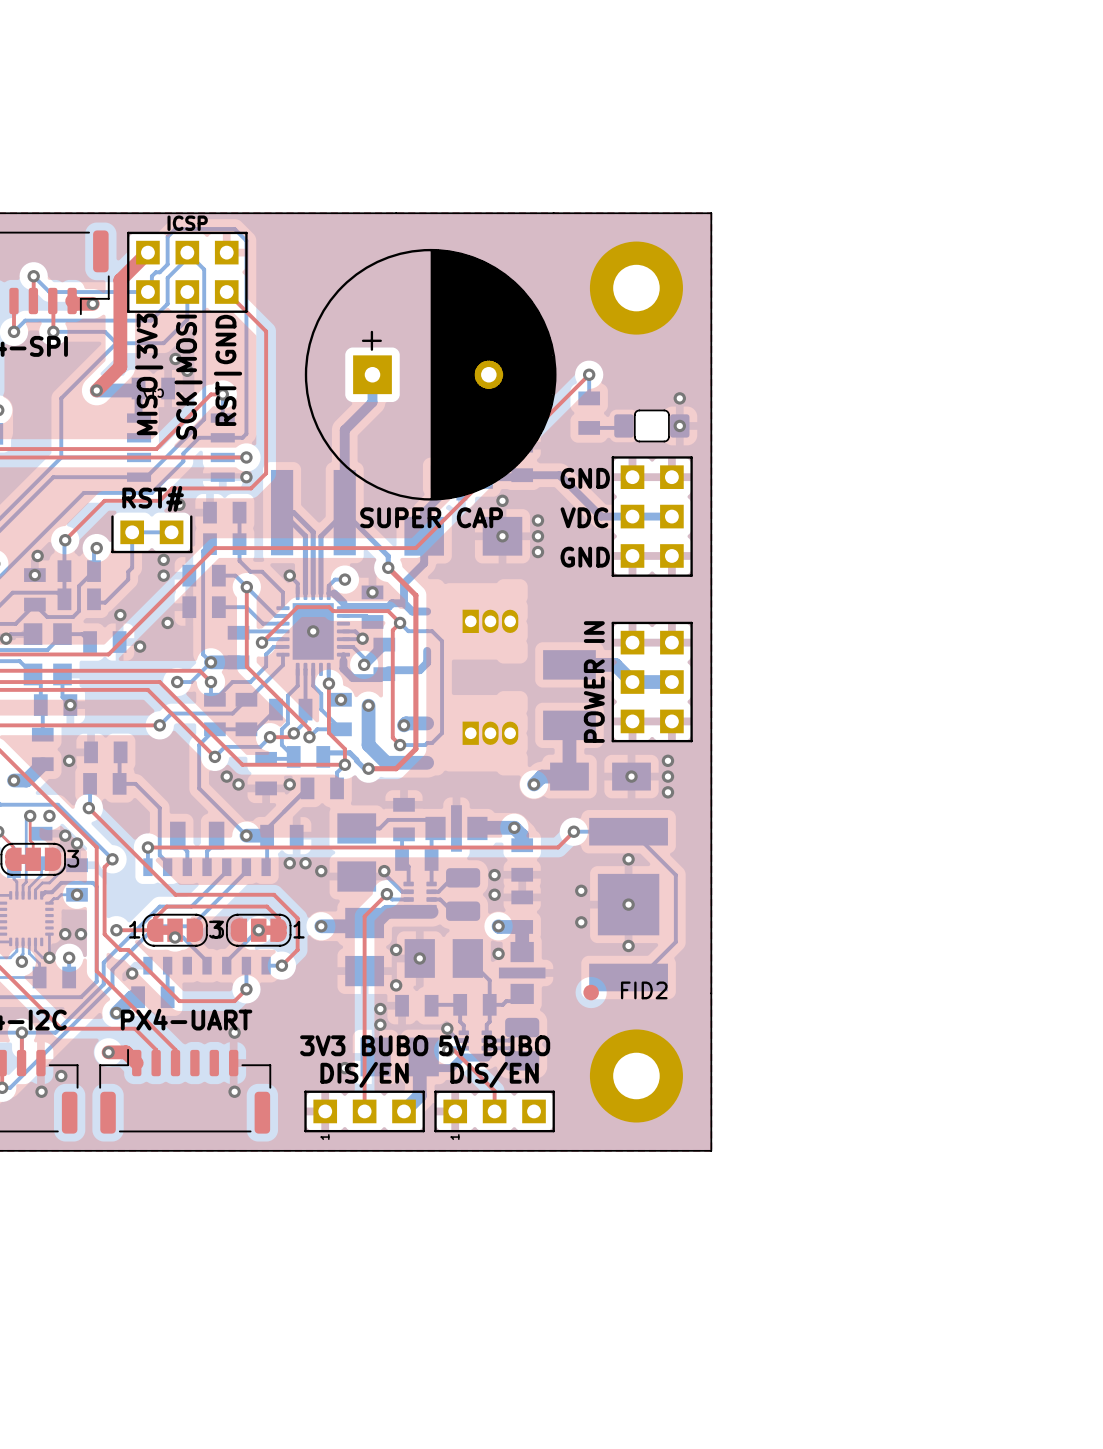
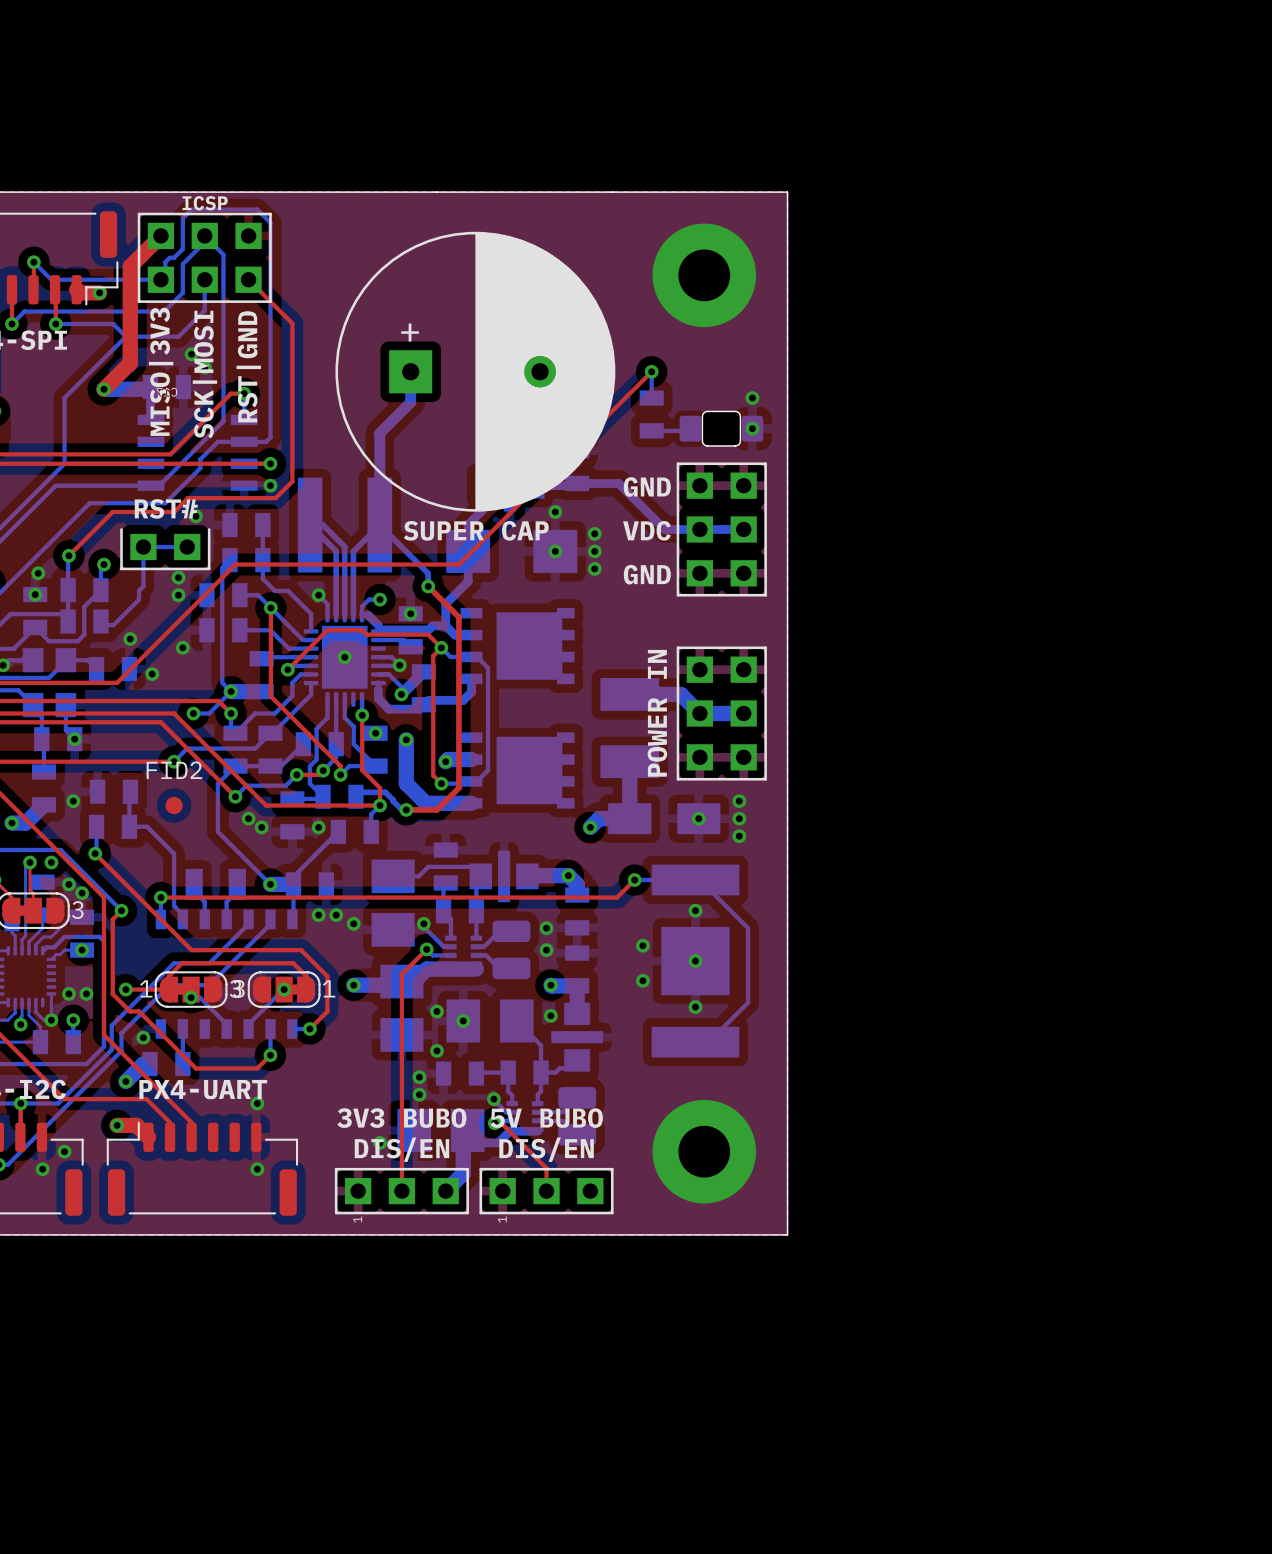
part: none -> (517, 646)
part: (490, 621) -> none
part: none -> (517, 770)
part: (490, 733) -> none
FID2 name position: FID2 (644, 990) -> FID2 (174, 770)
FID2 position: (591, 992) -> (174, 805)

